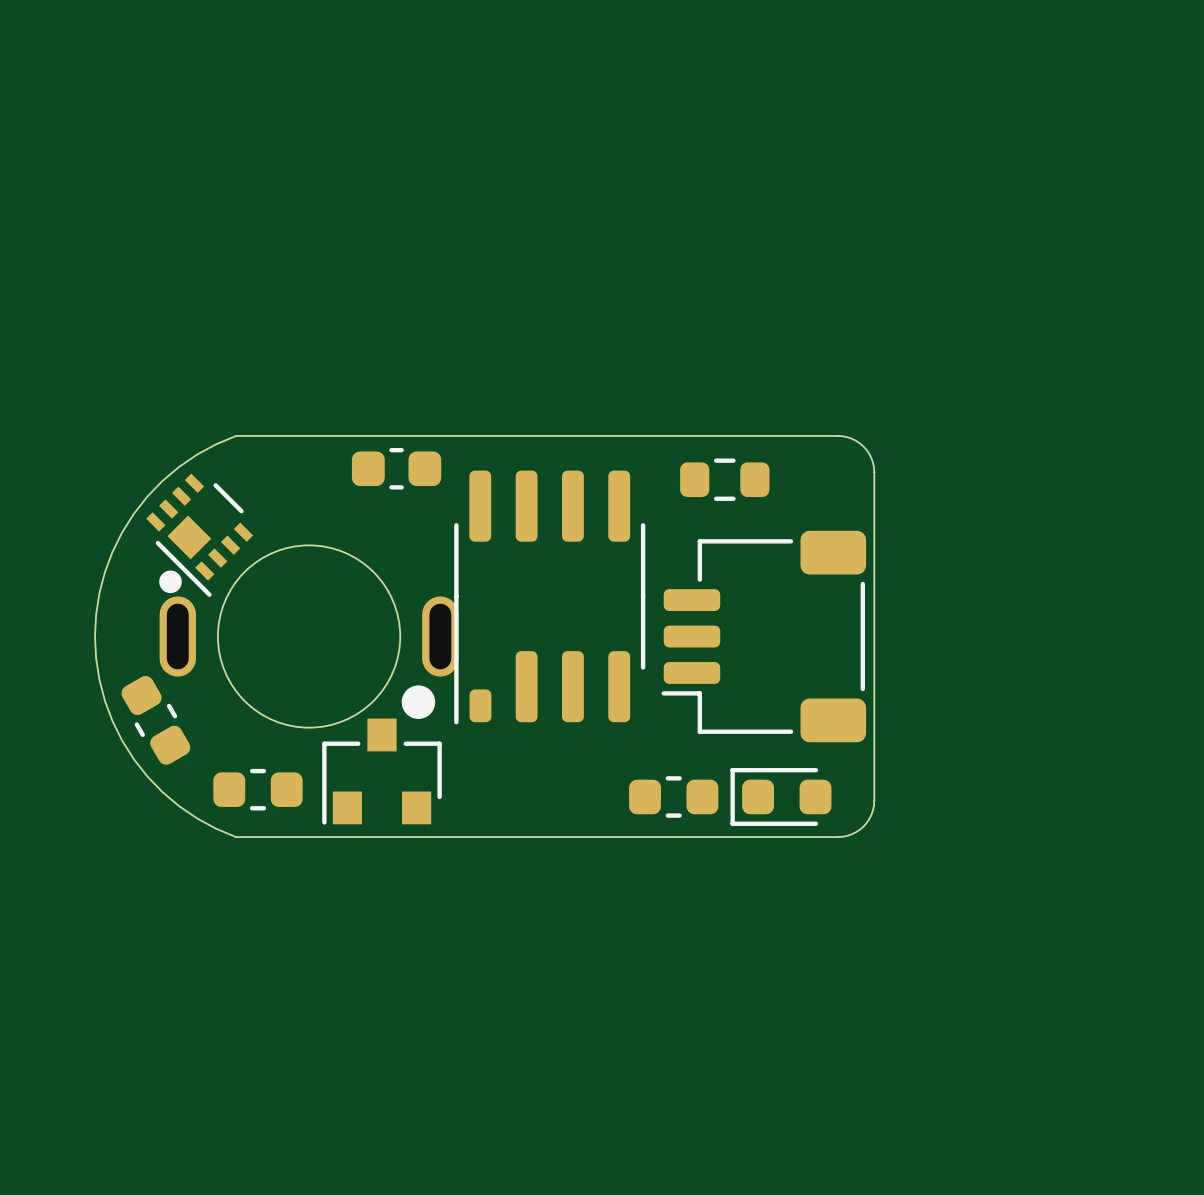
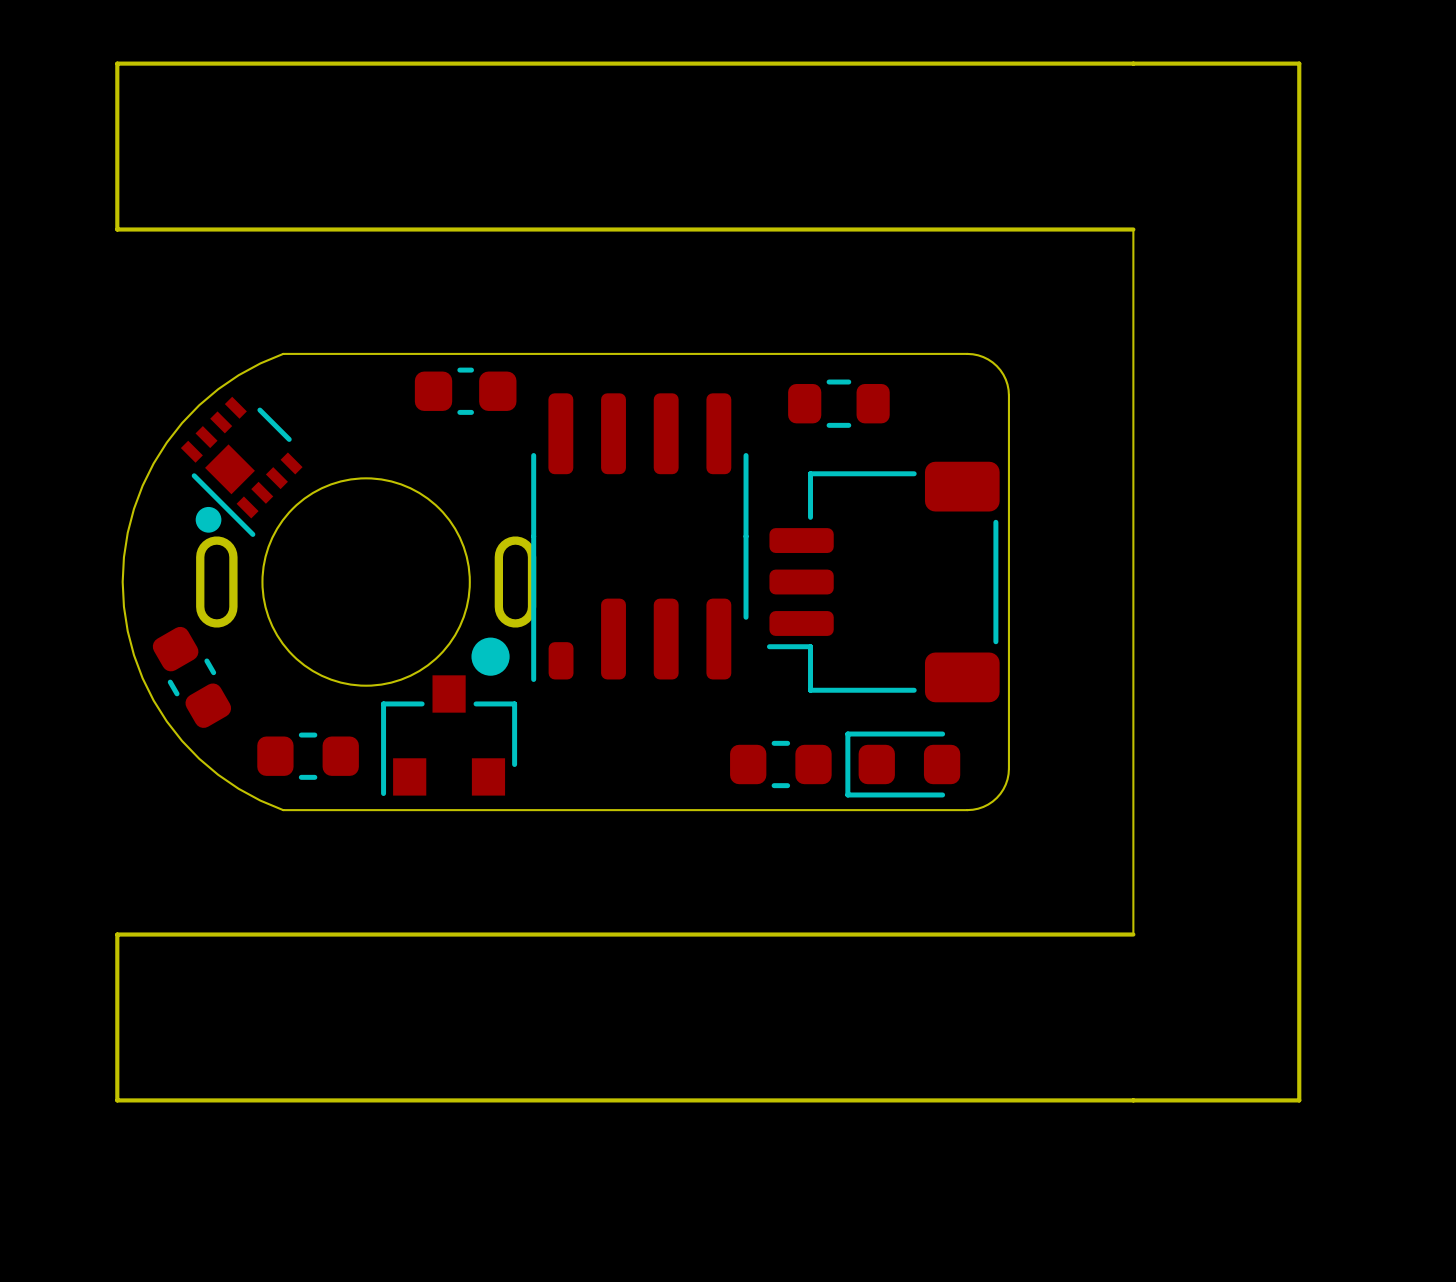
board edge: none -> (117, 63) (117, 229) (1133, 229) (1133, 934) (117, 934) (117, 1100) (1299, 1100) (1299, 63) (117, 63)

